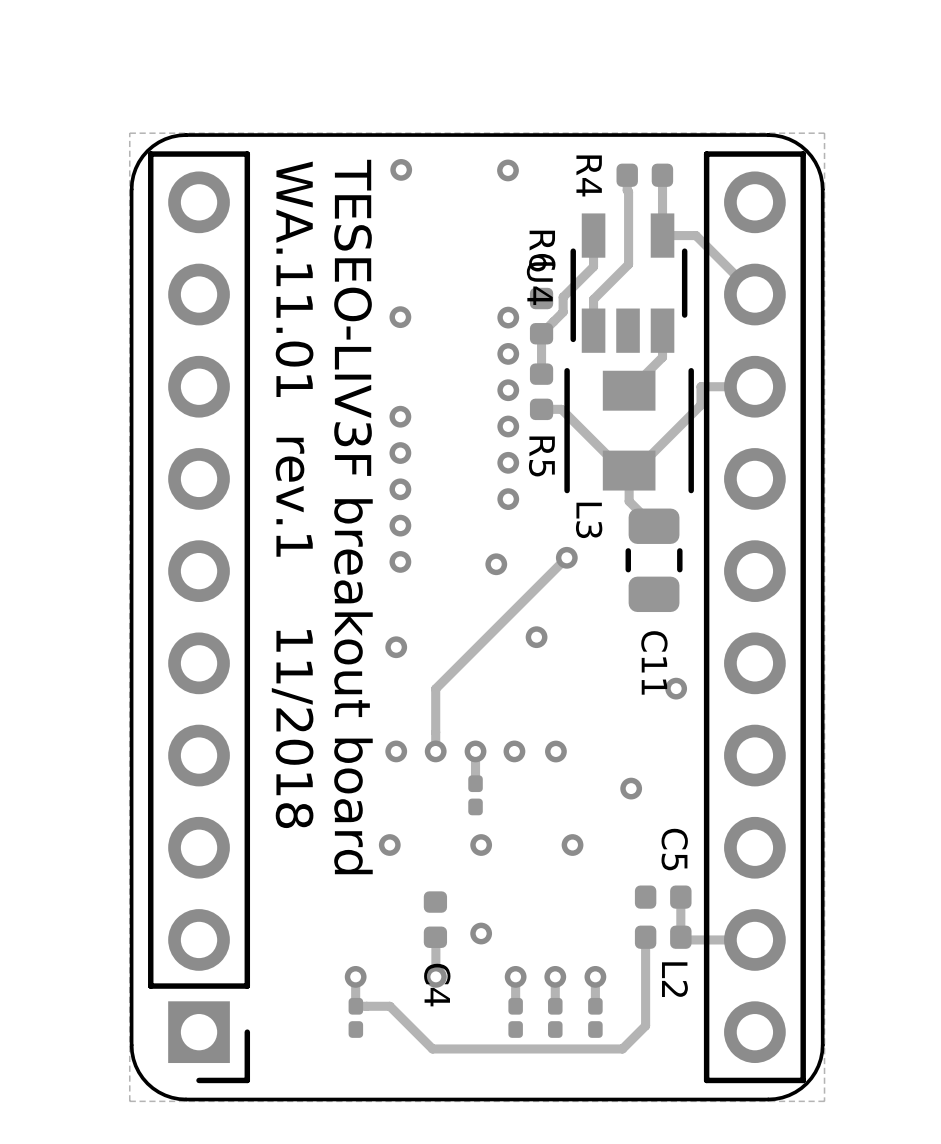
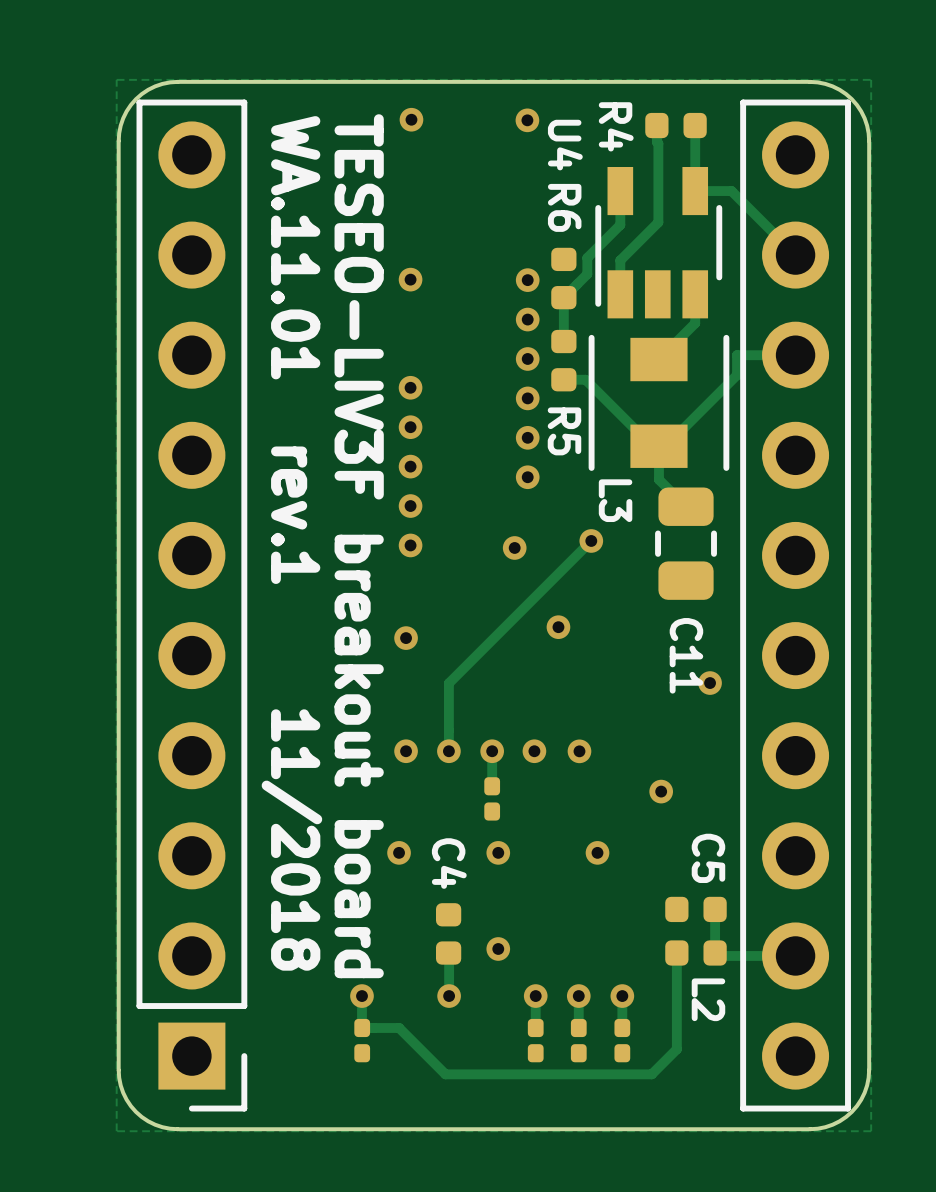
U4 name position: U4 (539, 283) -> U4 (565, 145)
C4 name position: C4 (437, 985) -> C4 (449, 863)

